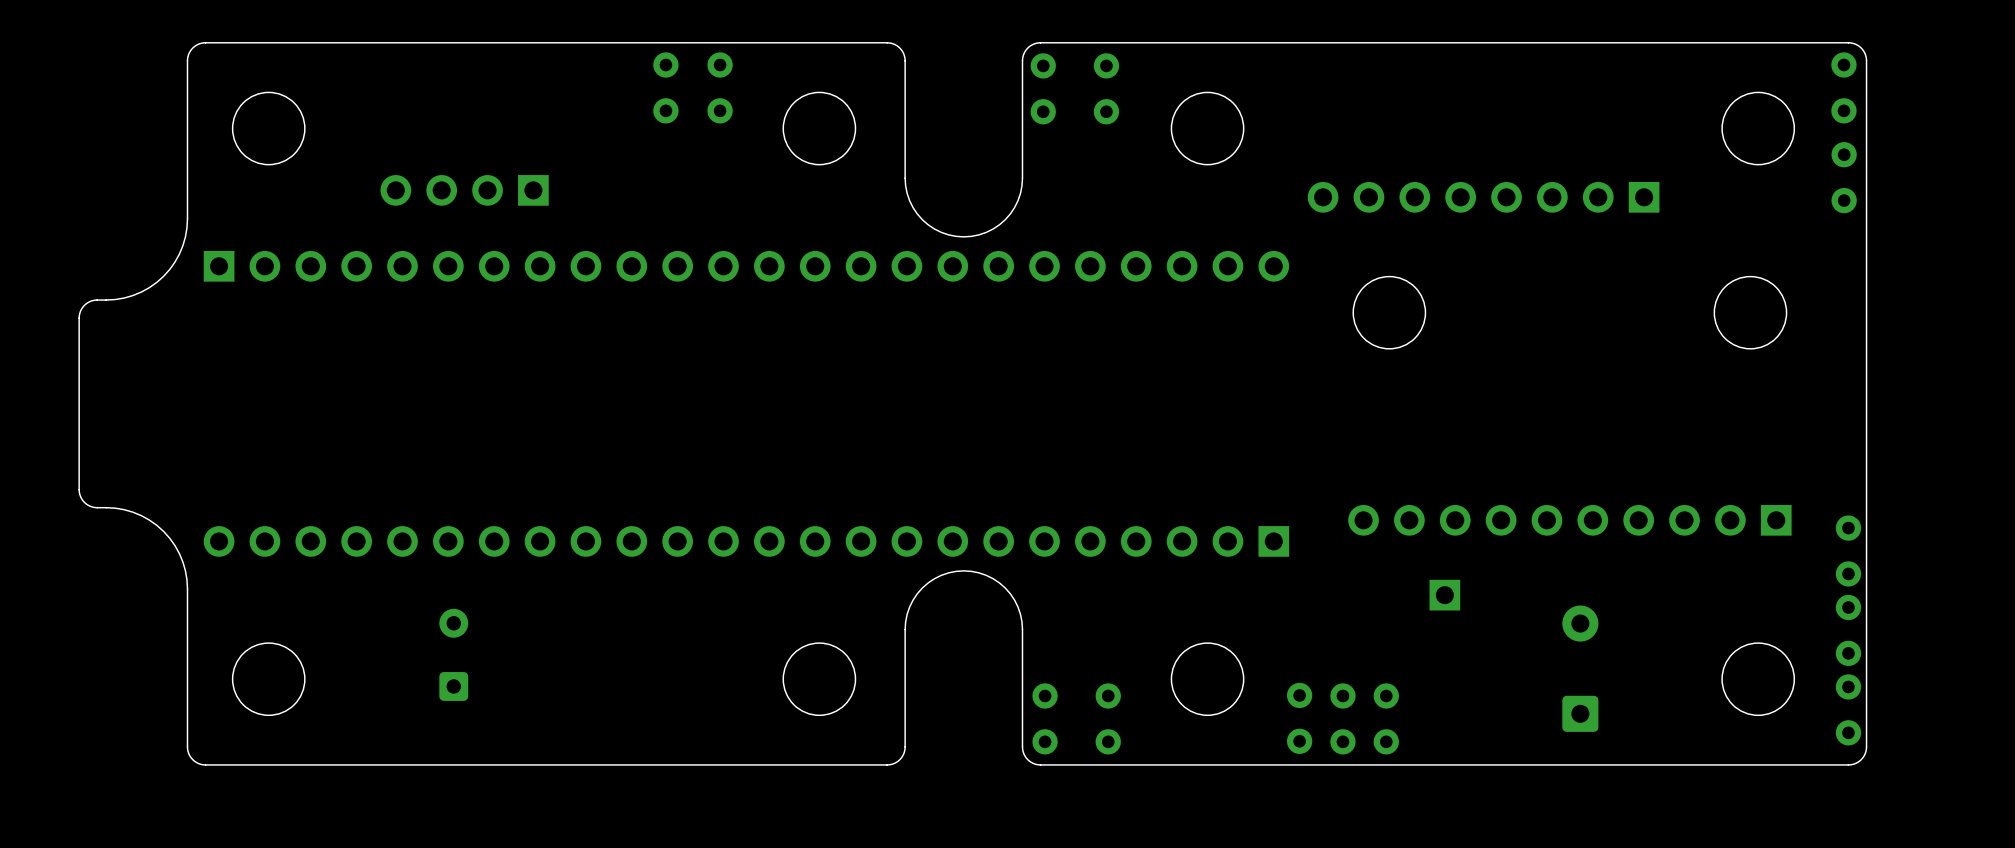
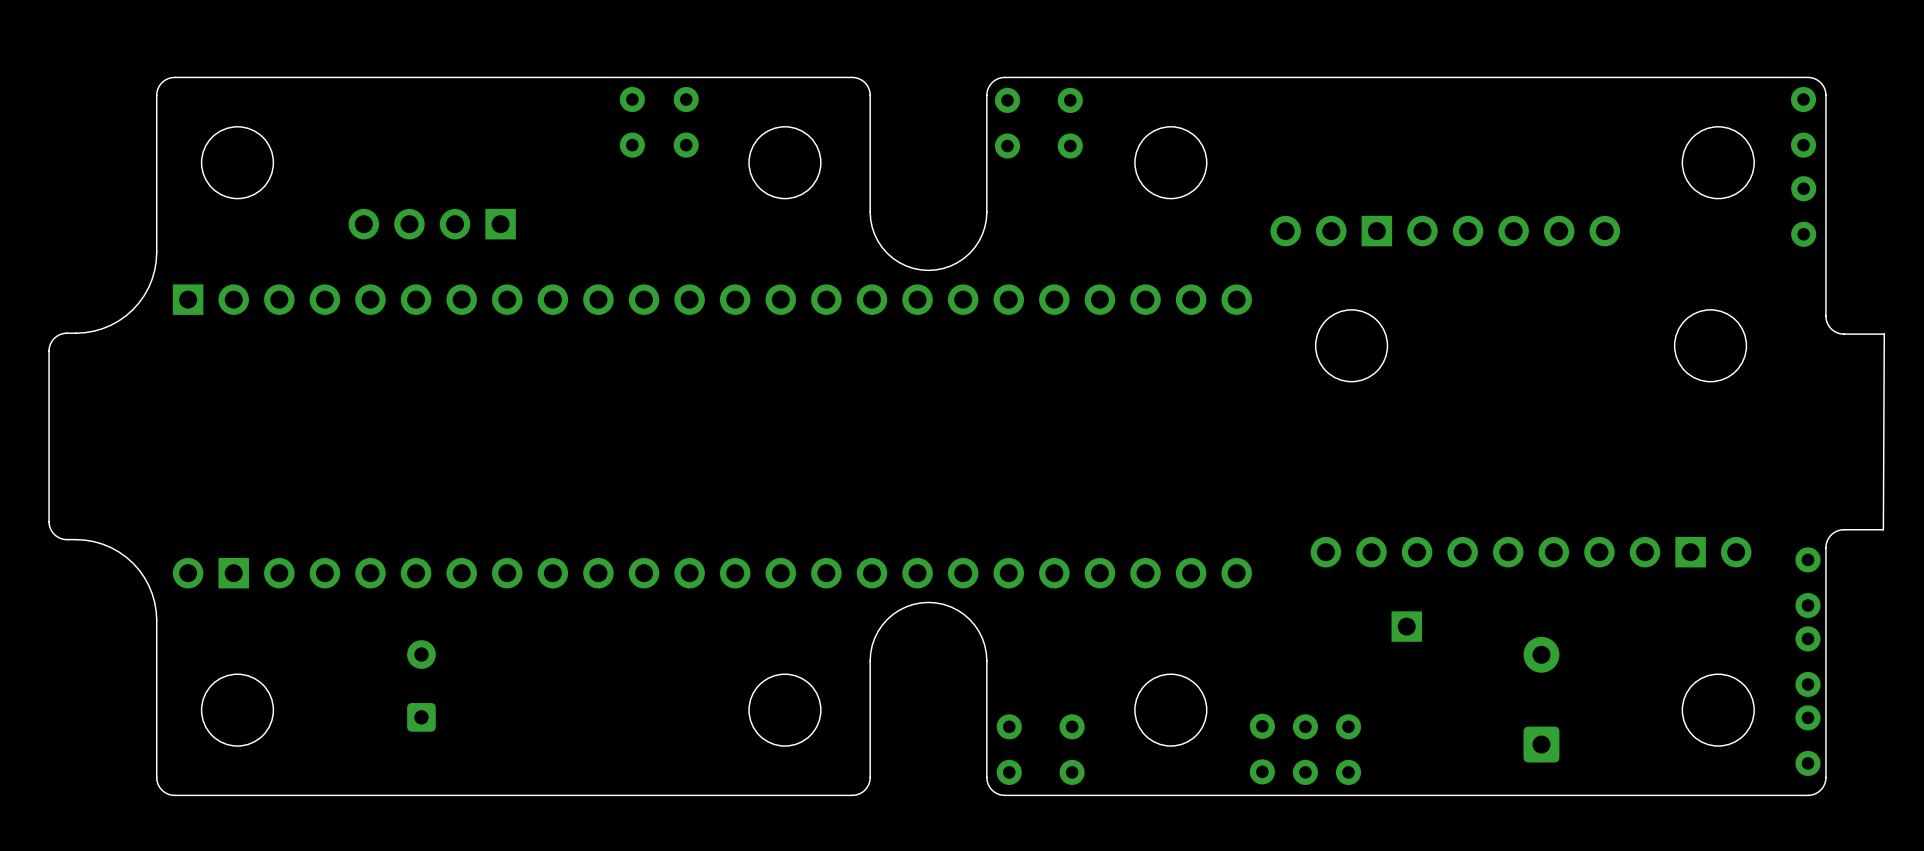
part footprint: [1307, 181, 1660, 213] -> [1270, 215, 1621, 247]
board edge: (1866, 282) (1866, 515) -> (1825, 316) (1828, 325) (1837, 333) (1884, 334) (1883, 529) (1837, 530) (1829, 536) (1825, 547)
part footprint: [1348, 504, 1792, 536] -> [1310, 536, 1752, 568]
part footprint: [203, 526, 1290, 557] -> [172, 557, 1252, 589]

